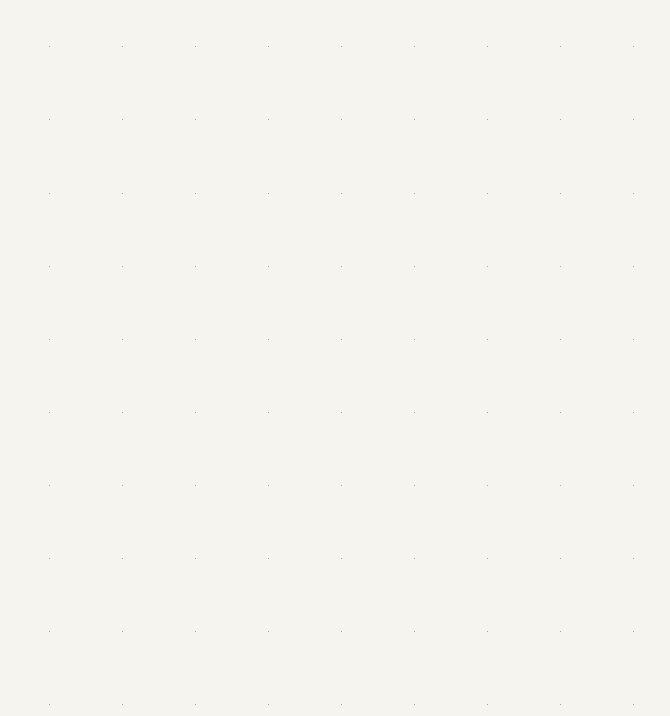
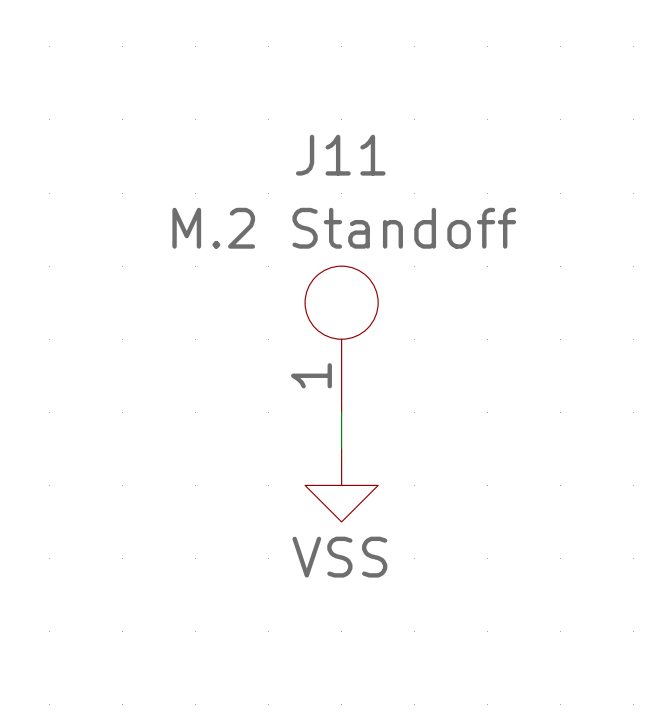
J11: none -> M.2 Standoff (341, 339)
wire: none -> (341, 412) (341, 448)
power symbol: none -> VSS (341, 485)

